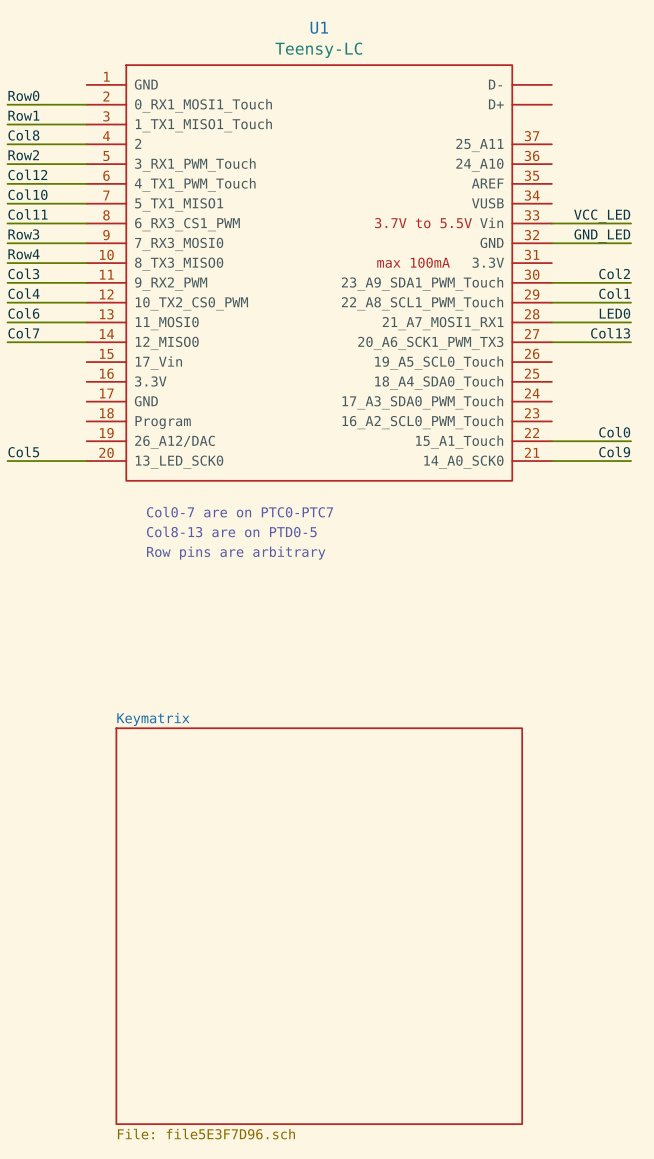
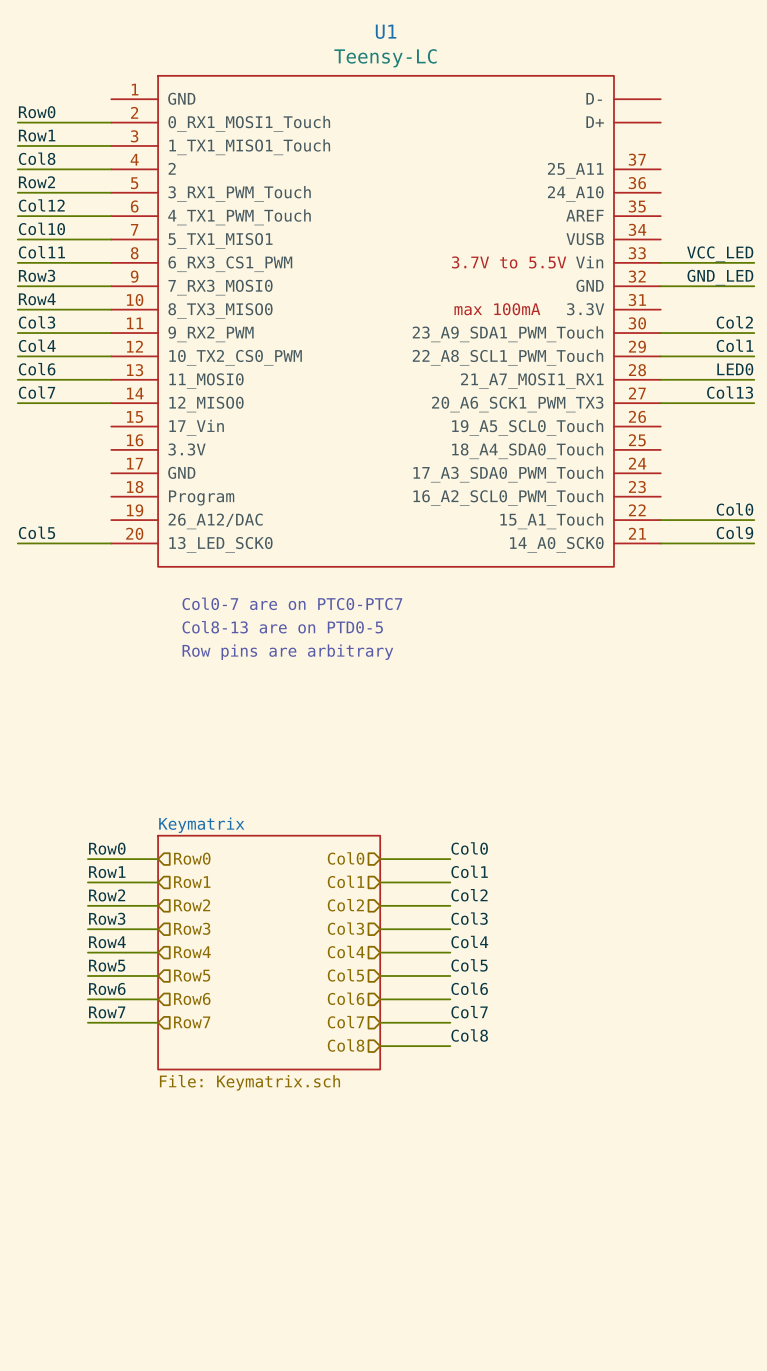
label: none -> Row0 (107, 848)
label: none -> Col0 (469, 848)
hierarchical label: none -> Row0 (192, 858)
hierarchical label: none -> Col0 (346, 858)
wire: none -> (87, 859) (158, 859)
label: none -> Row1 (107, 872)
label: none -> Col1 (469, 871)
hierarchical label: none -> Row1 (192, 882)
hierarchical label: none -> Col1 (346, 881)
wire: none -> (87, 882) (158, 882)
wire: none -> (380, 882) (450, 882)
label: none -> Col2 (469, 895)
label: none -> Row2 (107, 895)
wire: none -> (87, 905) (158, 905)
hierarchical label: none -> Row2 (192, 905)
hierarchical label: none -> Col2 (345, 905)
wire: none -> (380, 905) (450, 905)
label: none -> Row3 (107, 918)
label: none -> Col3 (469, 918)
wire: none -> (87, 929) (158, 929)
hierarchical label: none -> Row3 (192, 928)
hierarchical label: none -> Col3 (345, 928)
wire: none -> (380, 929) (450, 929)
label: none -> Row4 (107, 942)
label: none -> Col4 (469, 942)
hierarchical label: none -> Col4 (346, 952)
wire: none -> (87, 952) (158, 952)
hierarchical label: none -> Row4 (192, 952)
sheet Keymatrix: none -> File: Keymatrix.sch (269, 952)
wire: none -> (380, 952) (450, 952)
label: none -> Row5 (107, 965)
label: none -> Col5 (469, 965)
hierarchical label: none -> Row5 (192, 975)
hierarchical label: none -> Col5 (345, 975)
wire: none -> (87, 975) (158, 975)
wire: none -> (380, 975) (450, 975)
label: none -> Row6 (107, 988)
label: none -> Col6 (469, 988)
hierarchical label: none -> Row6 (192, 998)
hierarchical label: none -> Col6 (346, 998)
wire: none -> (87, 999) (158, 999)
wire: none -> (380, 999) (450, 999)
label: none -> Col7 (469, 1012)
label: none -> Row7 (107, 1012)
wire: none -> (87, 1022) (158, 1022)
hierarchical label: none -> Row7 (192, 1022)
hierarchical label: none -> Col7 (345, 1022)
wire: none -> (380, 1022) (450, 1022)
label: none -> Col8 (469, 1035)
hierarchical label: none -> Col8 (346, 1045)
wire: none -> (380, 1046) (450, 1046)
sheet Keymatrix: File: file5E3F7D96.sch (319, 926) -> none

